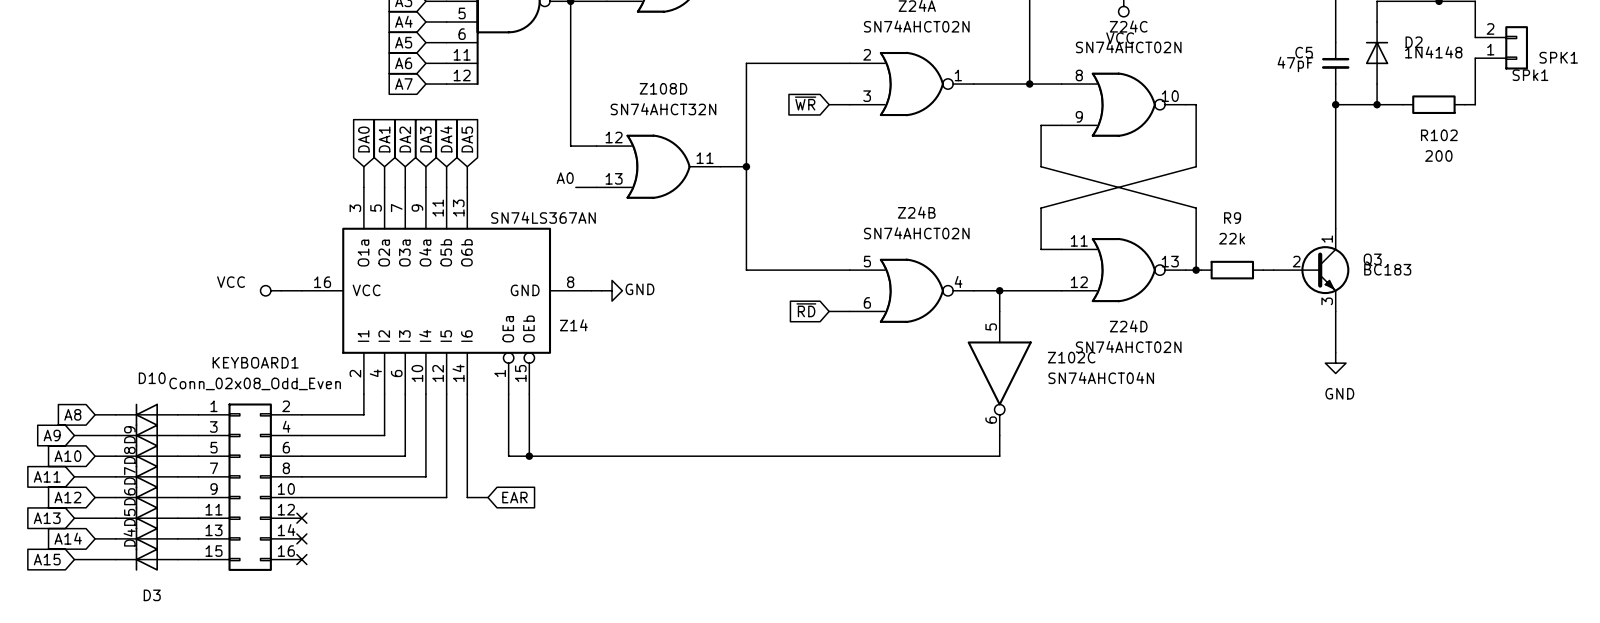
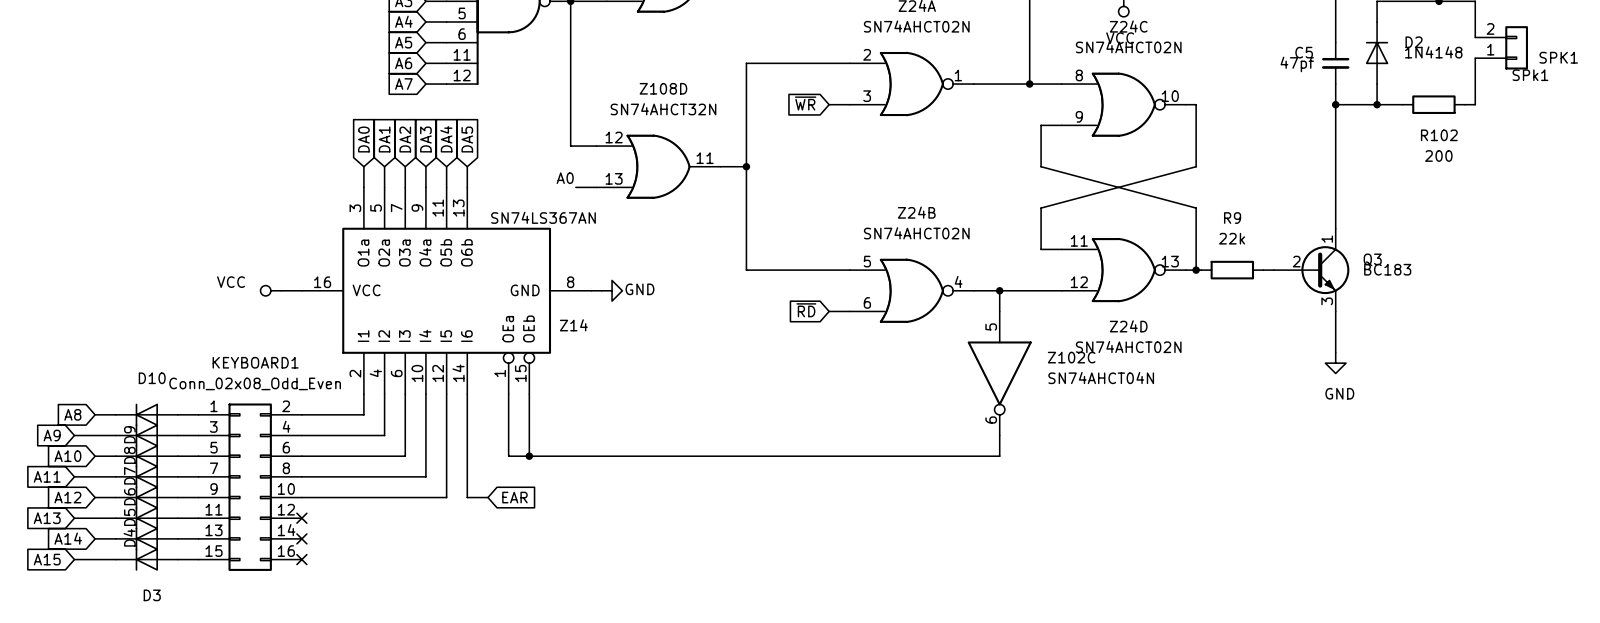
C5 value: 47pF (1295, 64) -> 47pf (1297, 64)

